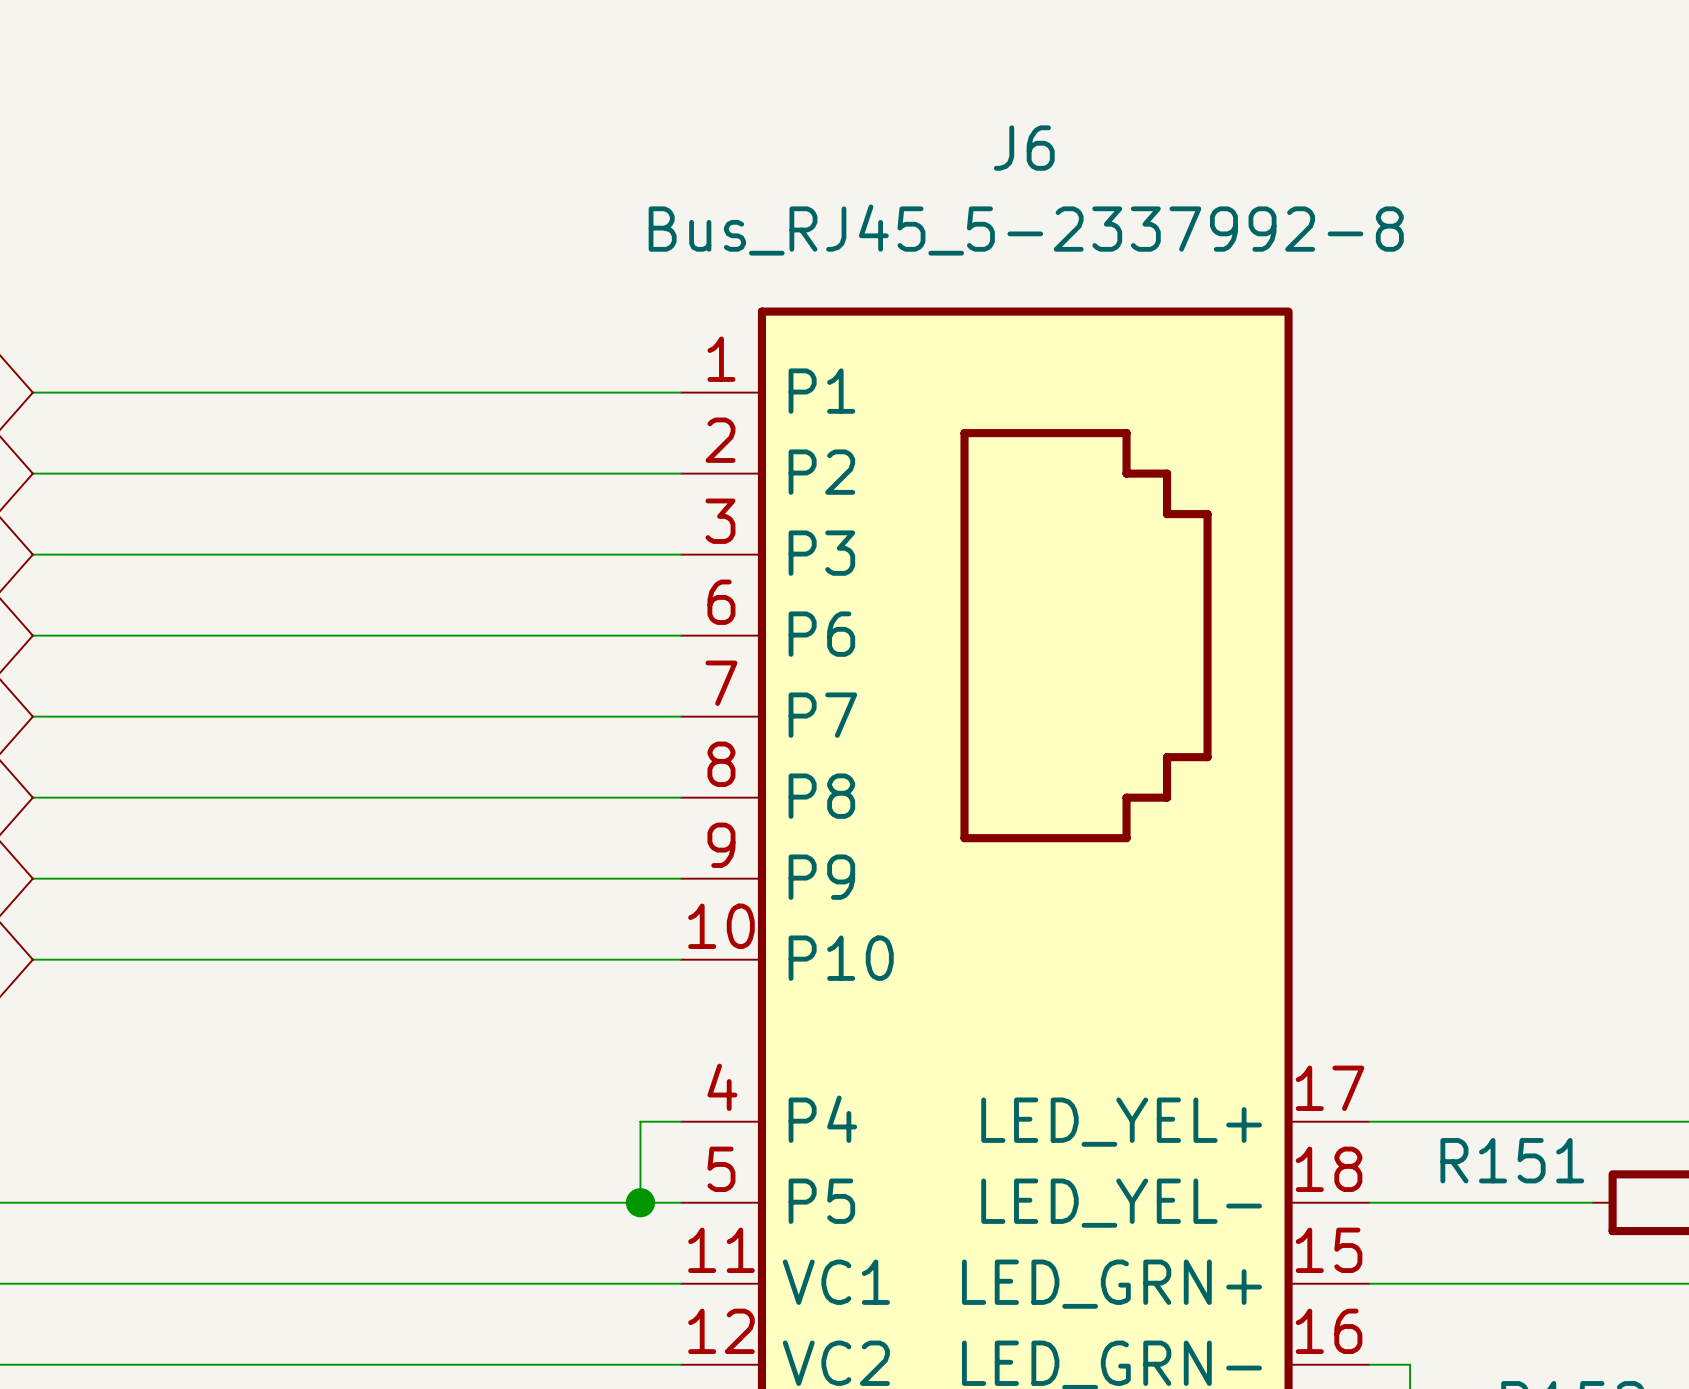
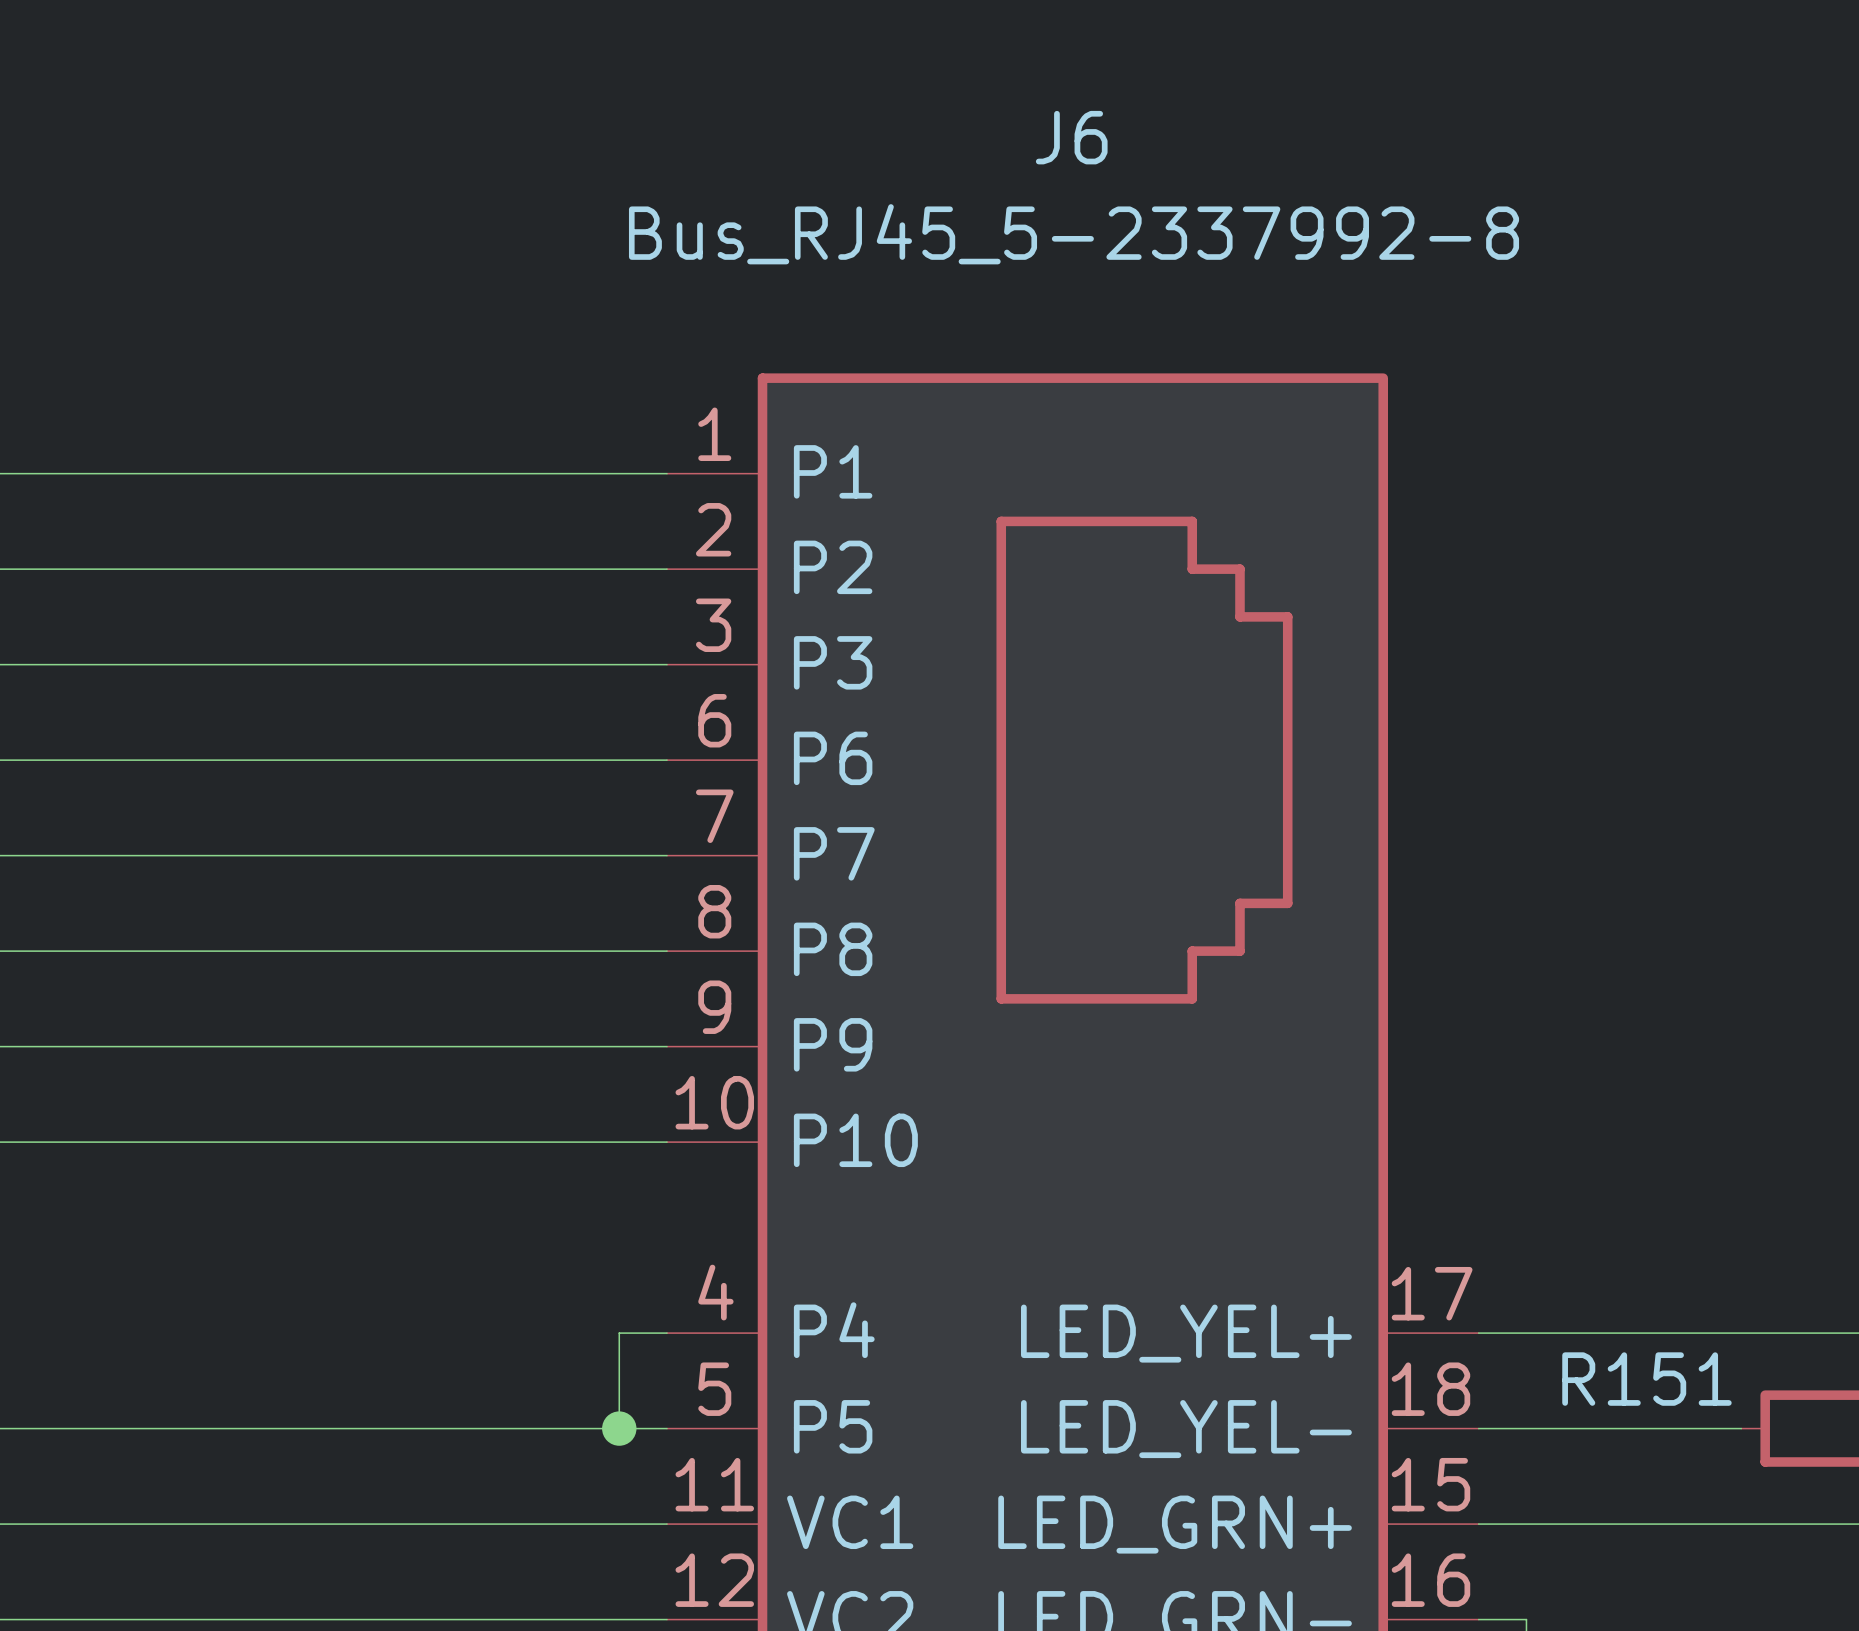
J6 name position: J6 (1024, 148) -> J6 (1071, 137)
J6 value position: Bus_RJ45_5-2337992-8 (1026, 230) -> Bus_RJ45_5-2337992-8 (1074, 234)

